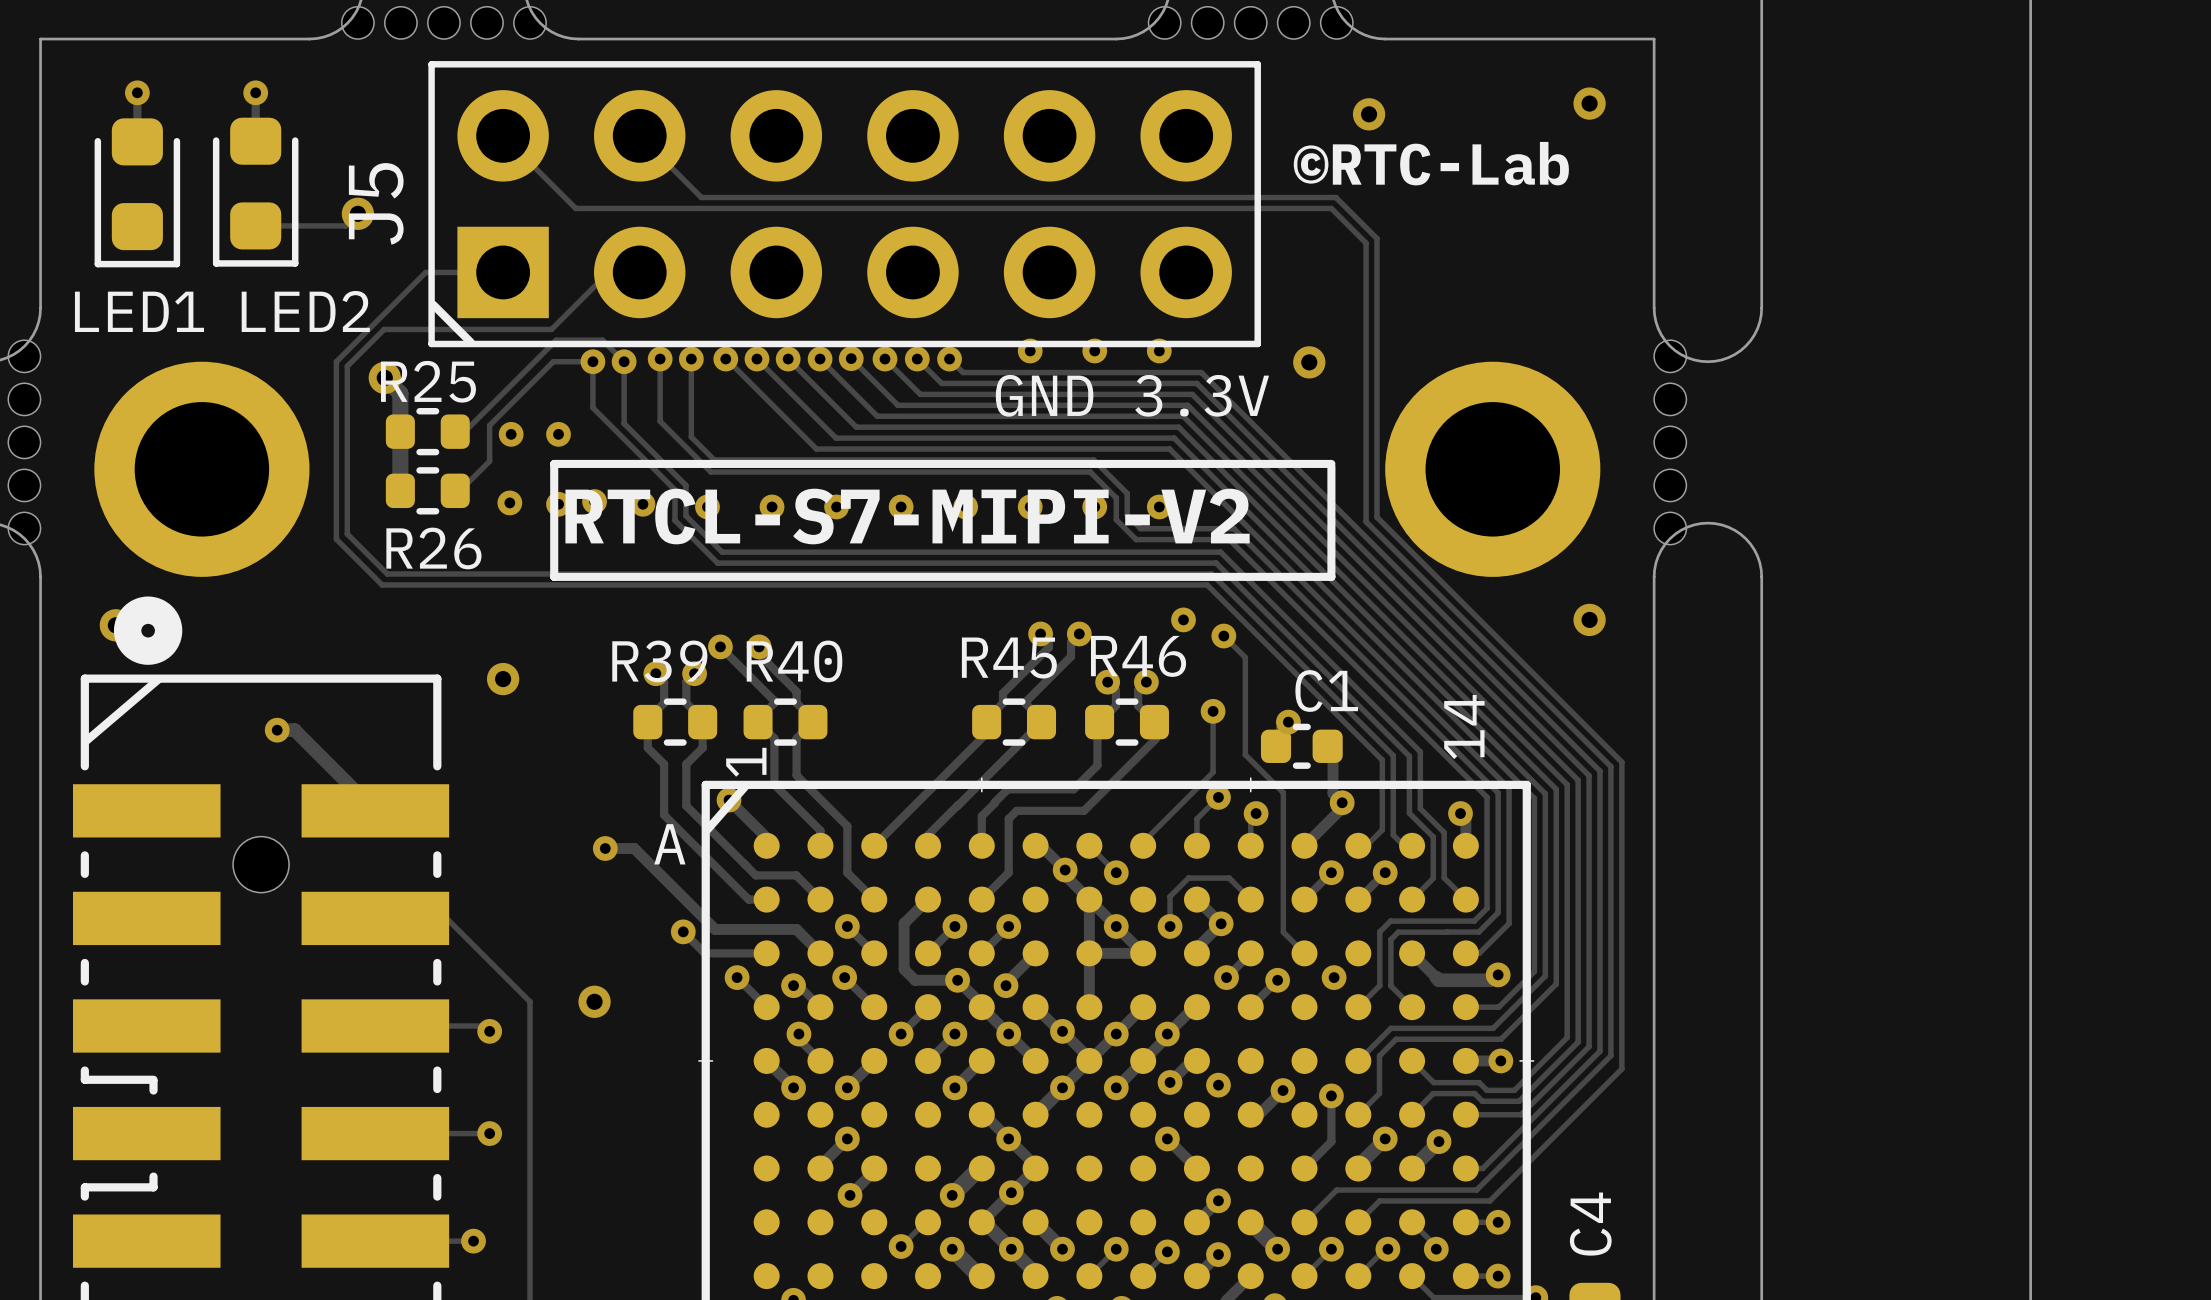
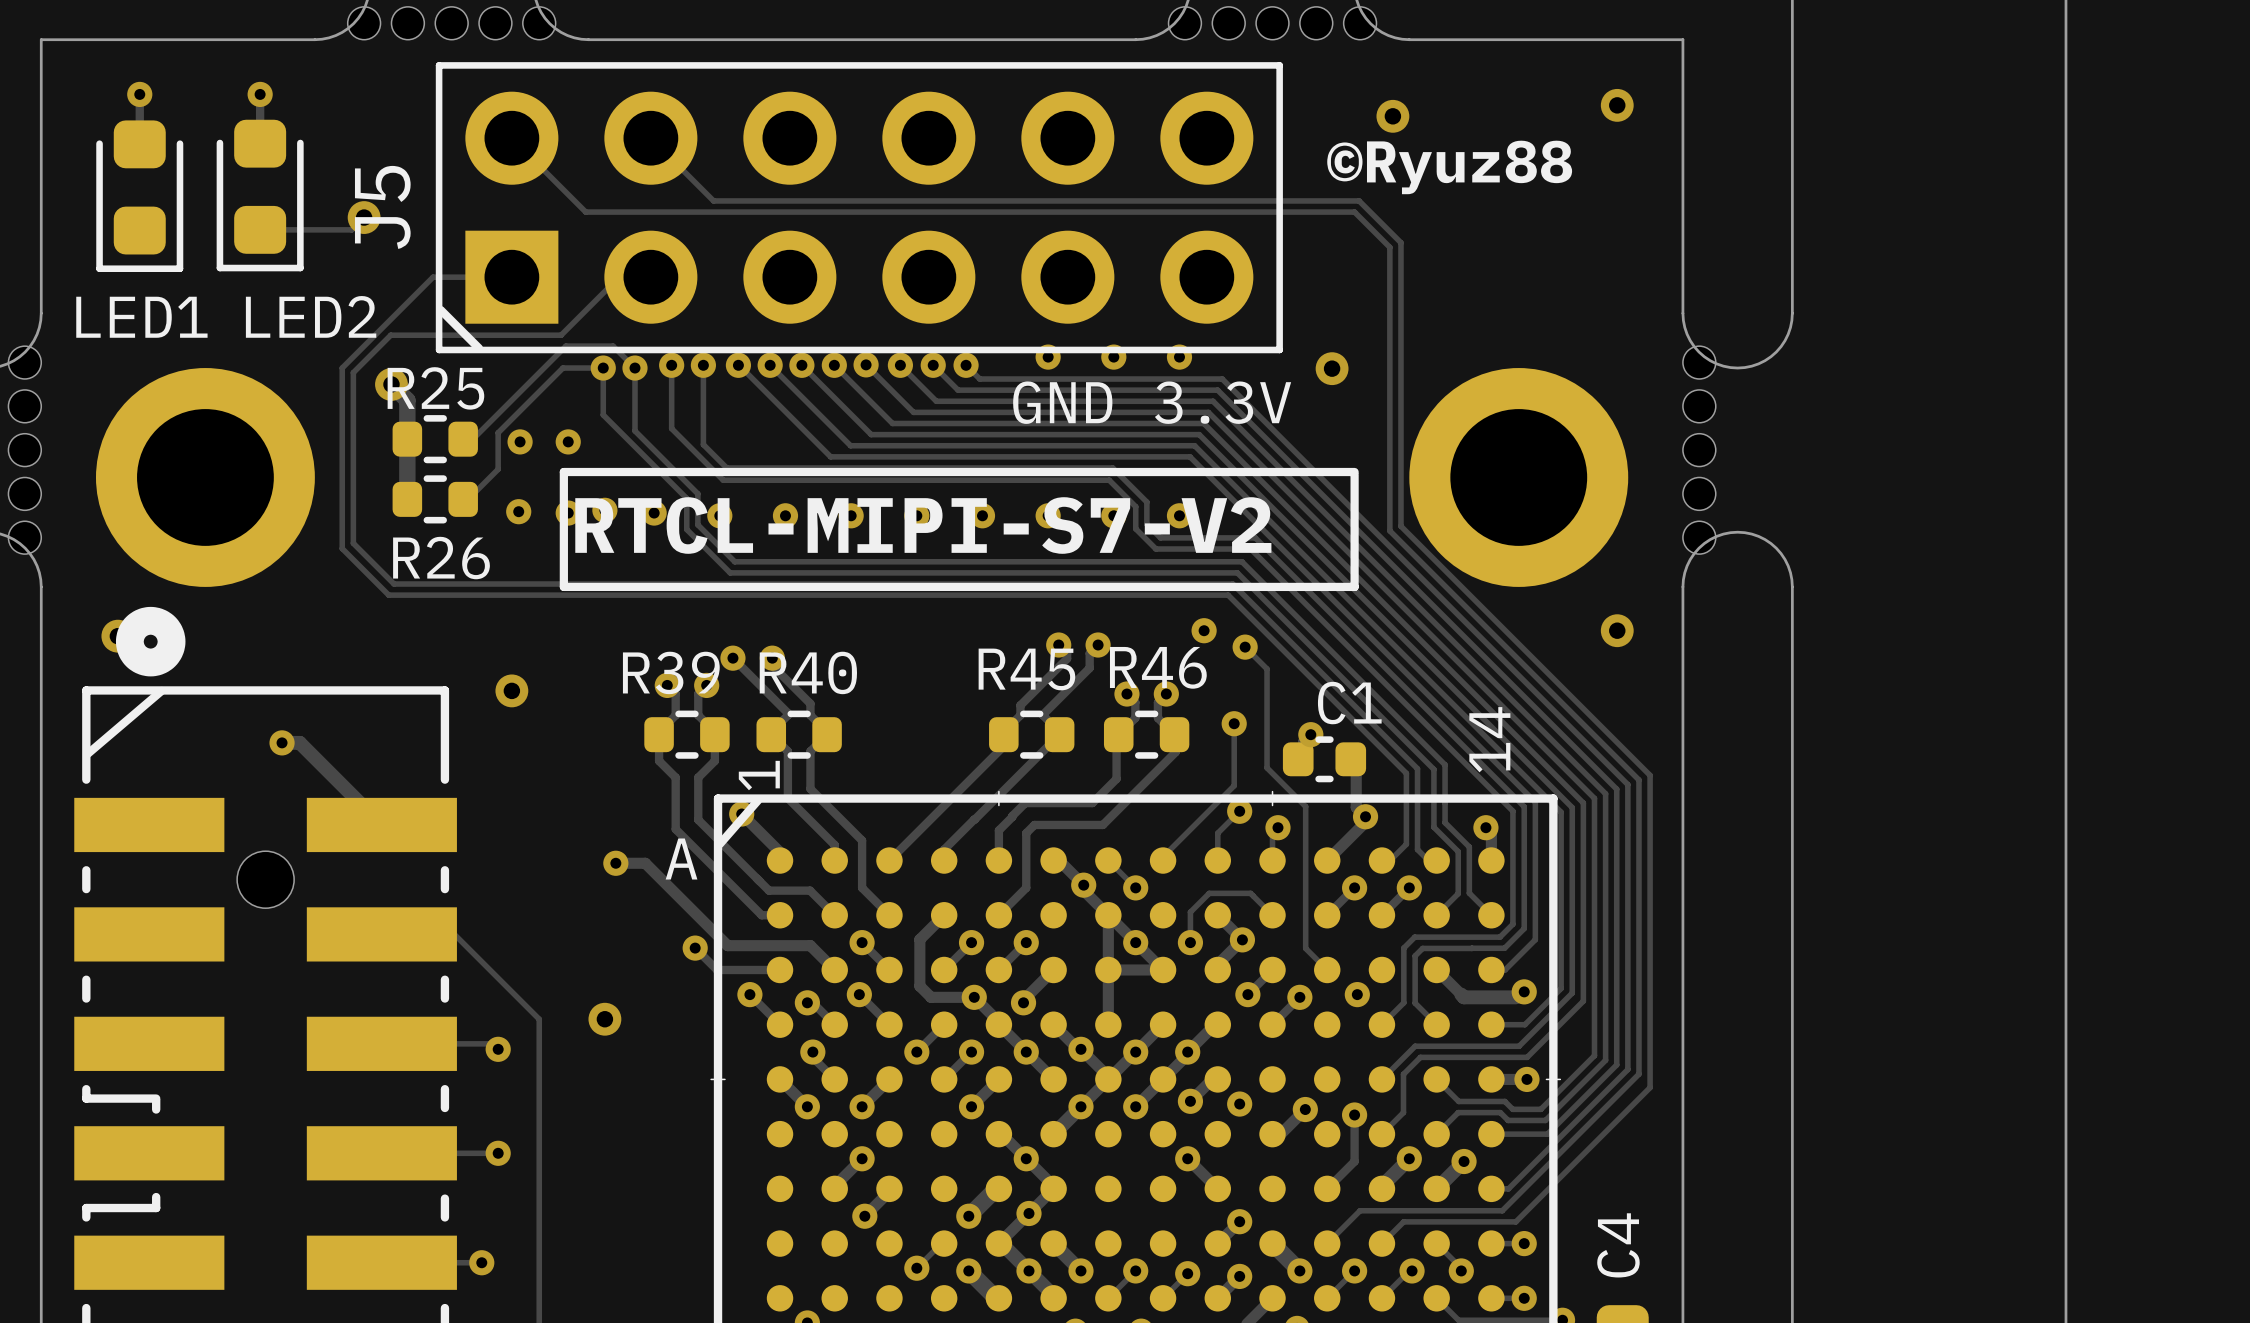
text: ©RTC-Lab (1431, 163) -> ©Ryuz88 (1449, 167)
text: RTCL-S7-MIPI-V2 (907, 516) -> RTCL-MIPI-S7-V2 (923, 525)

